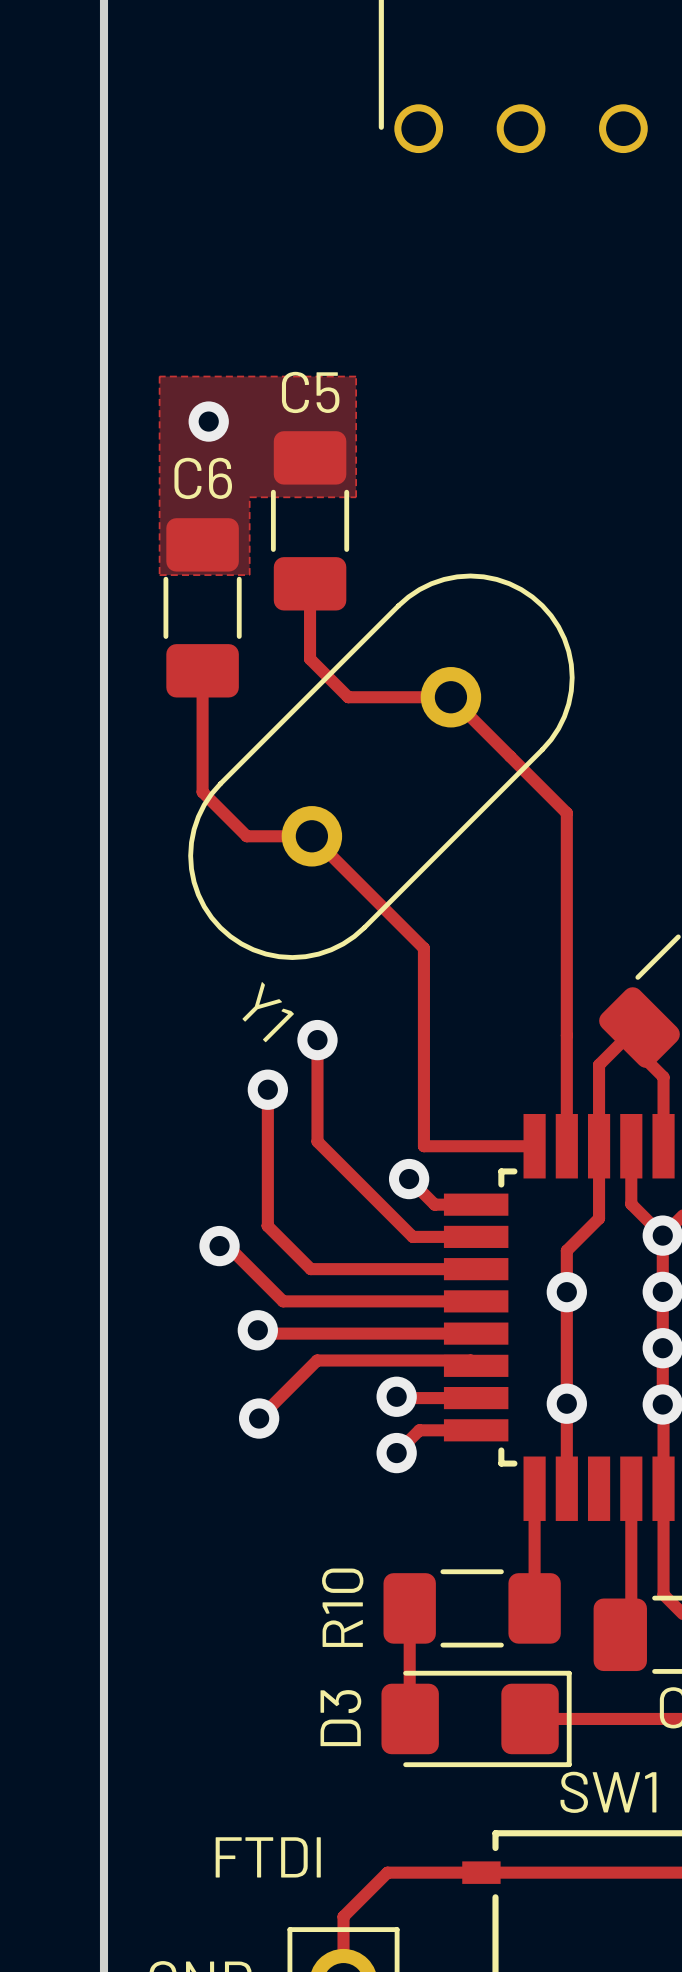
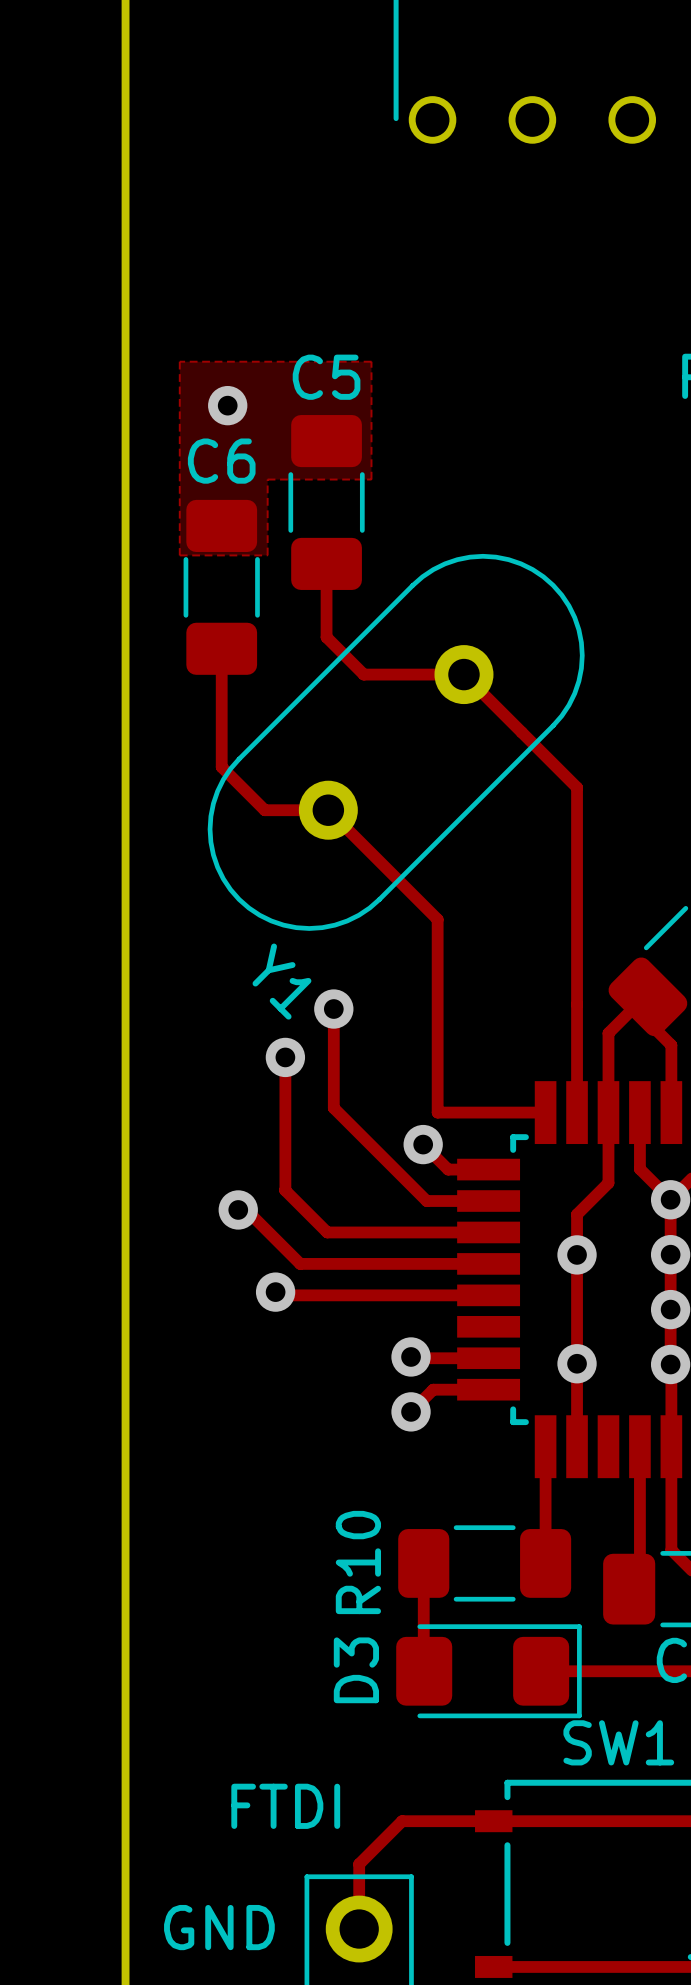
track: (476, 1365) (470, 1360) (317, 1360) (259, 1418) -> none
via: (259, 1418) -> none

